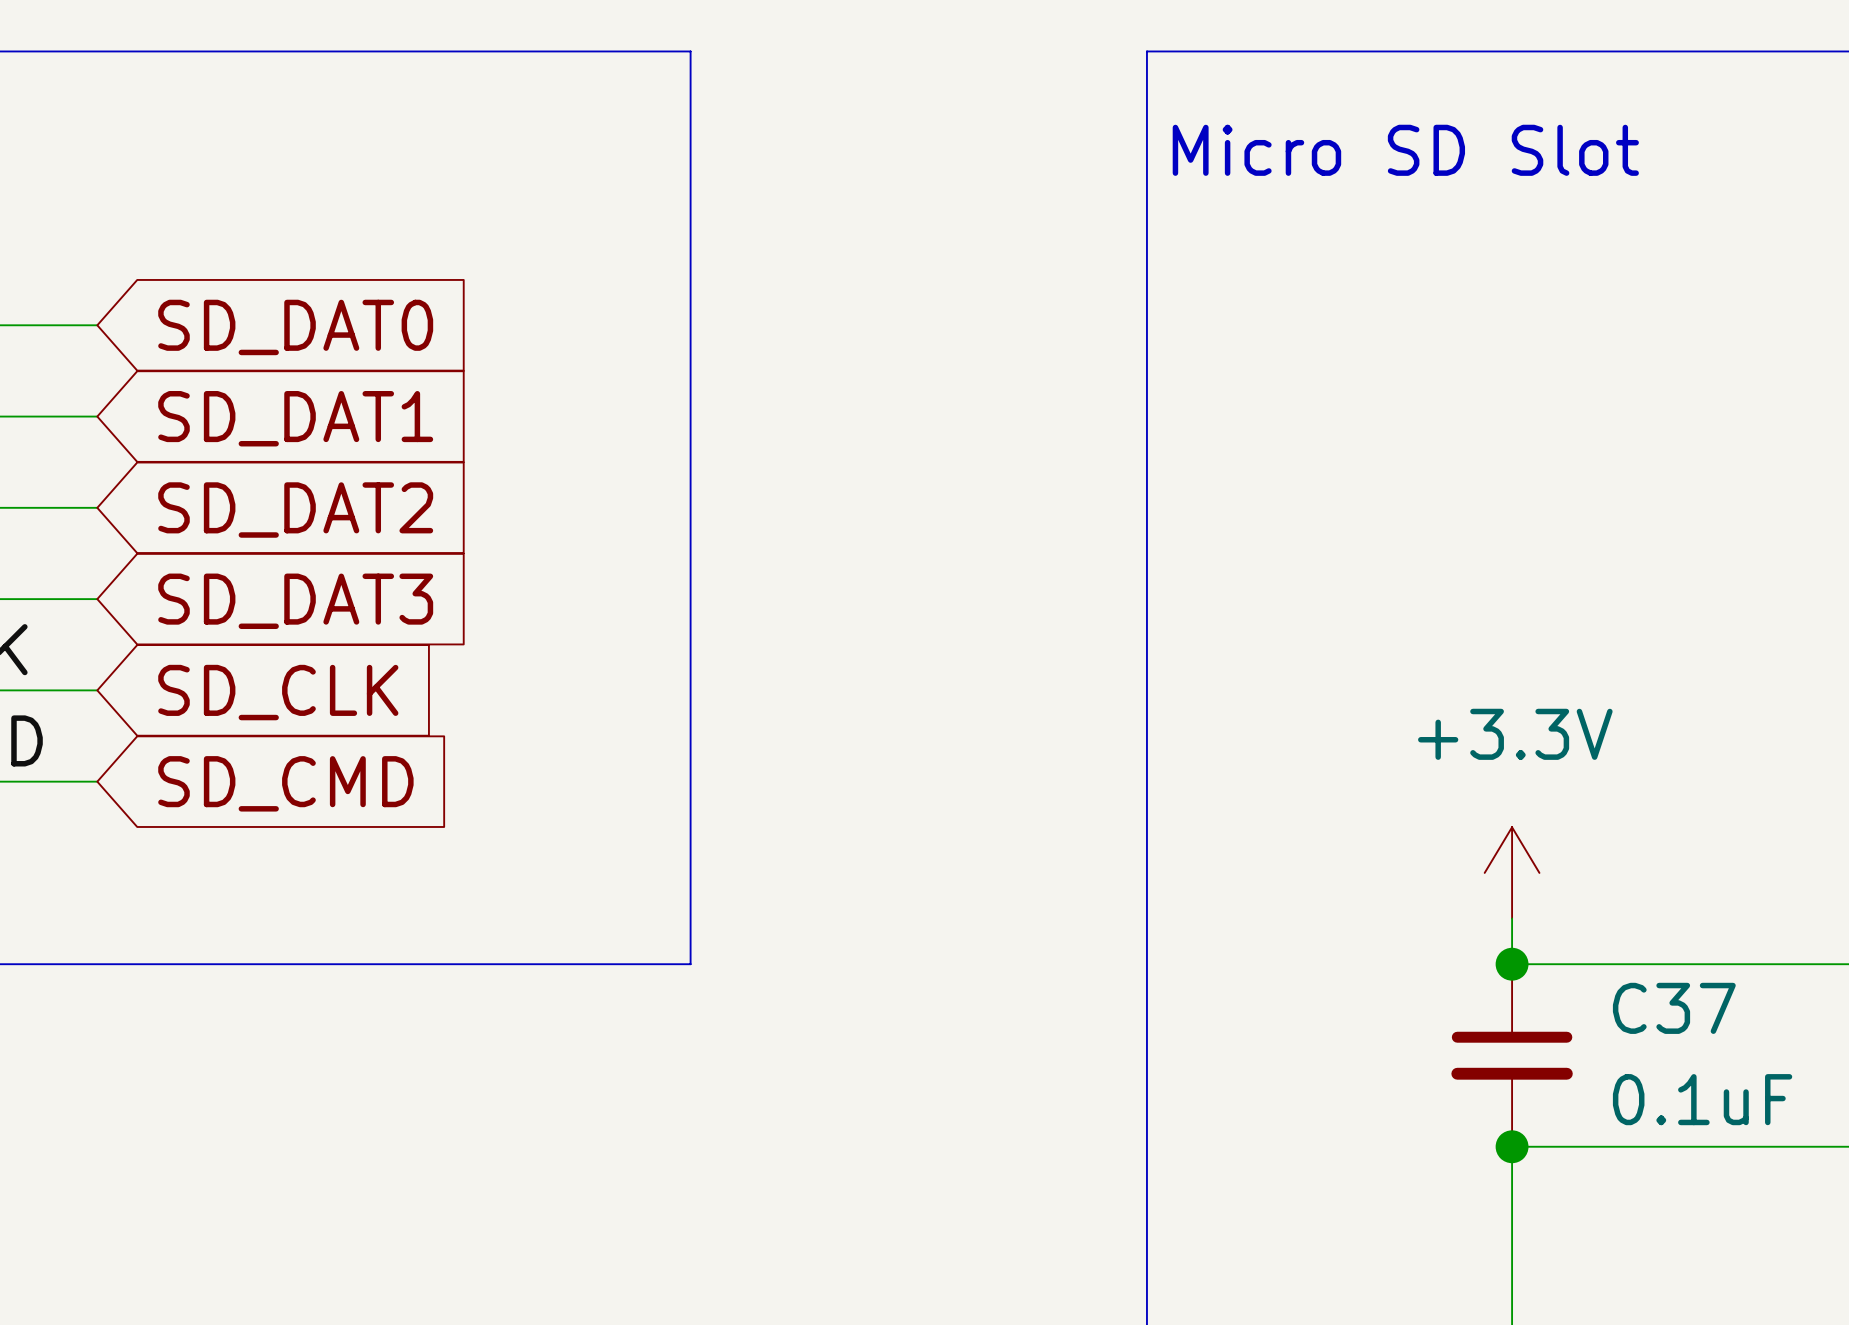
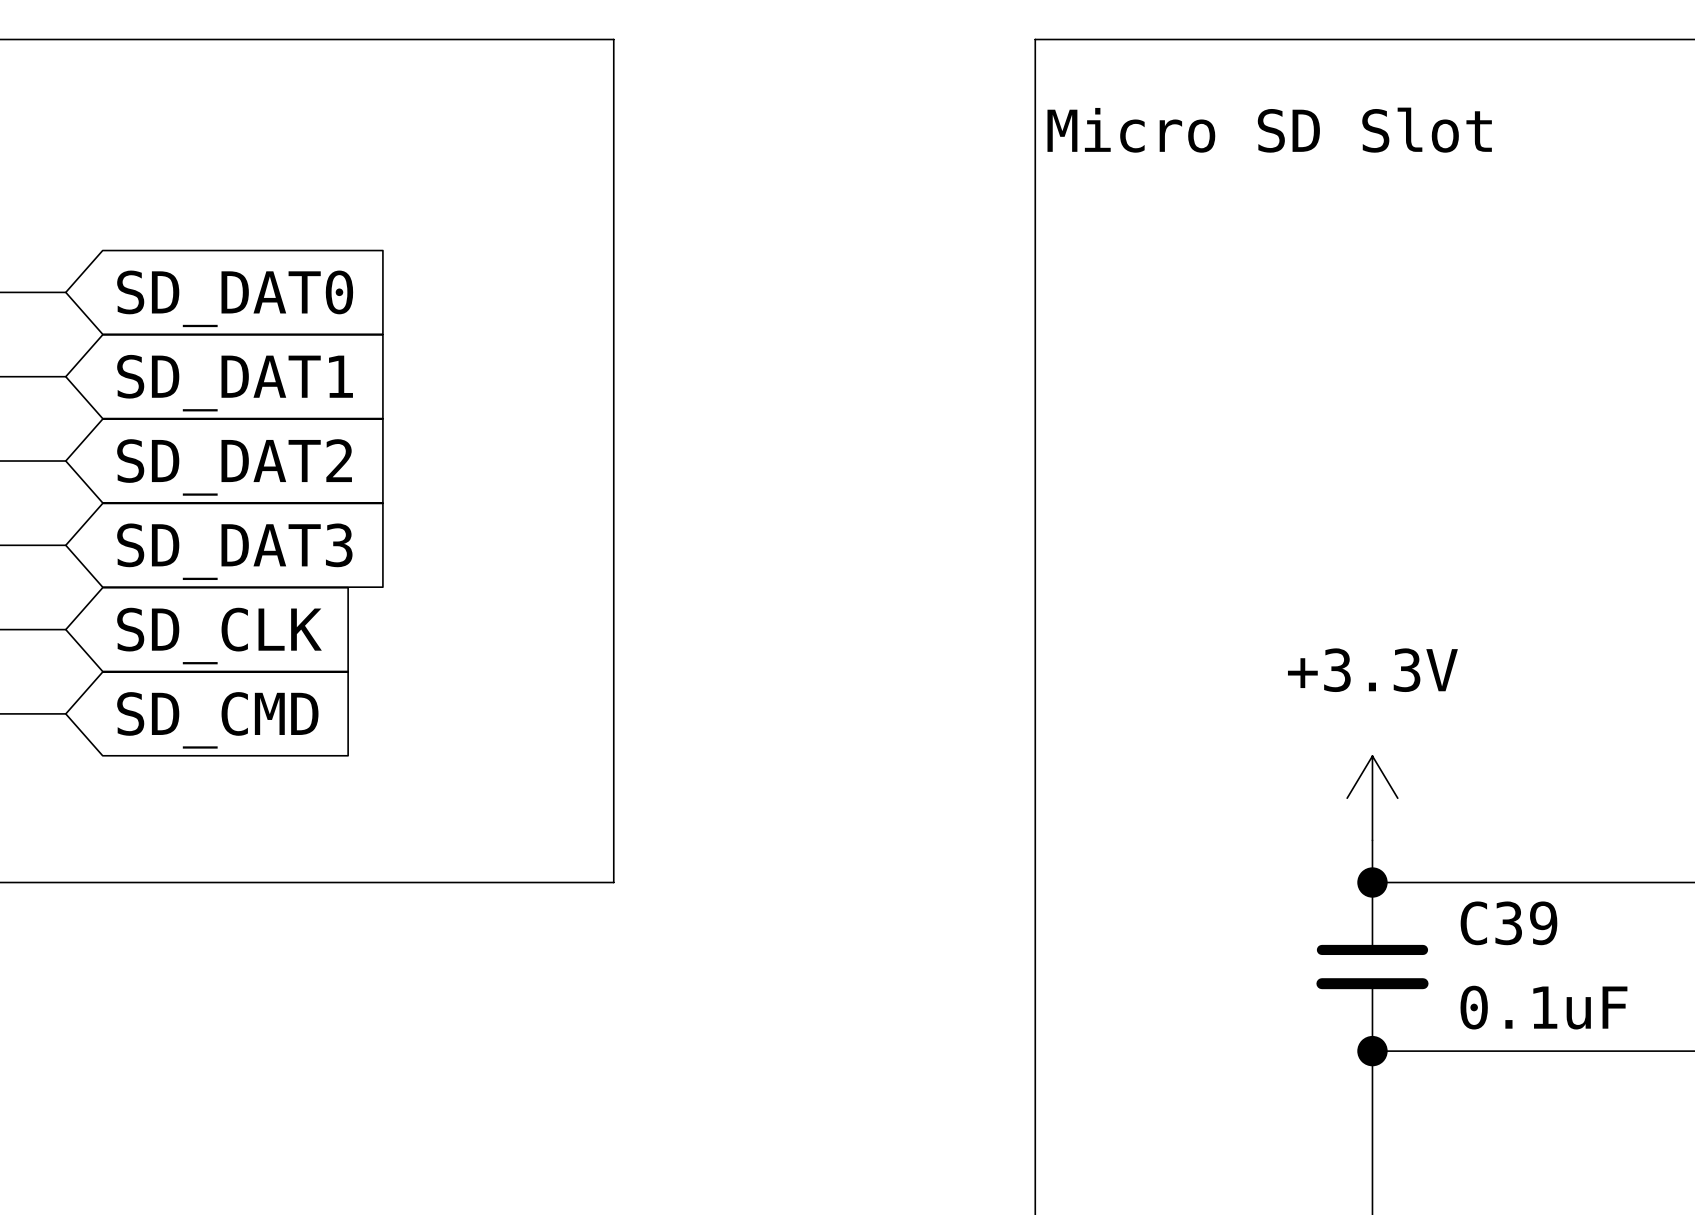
C37 name: C37 (1674, 1008) -> C39 (1508, 923)

